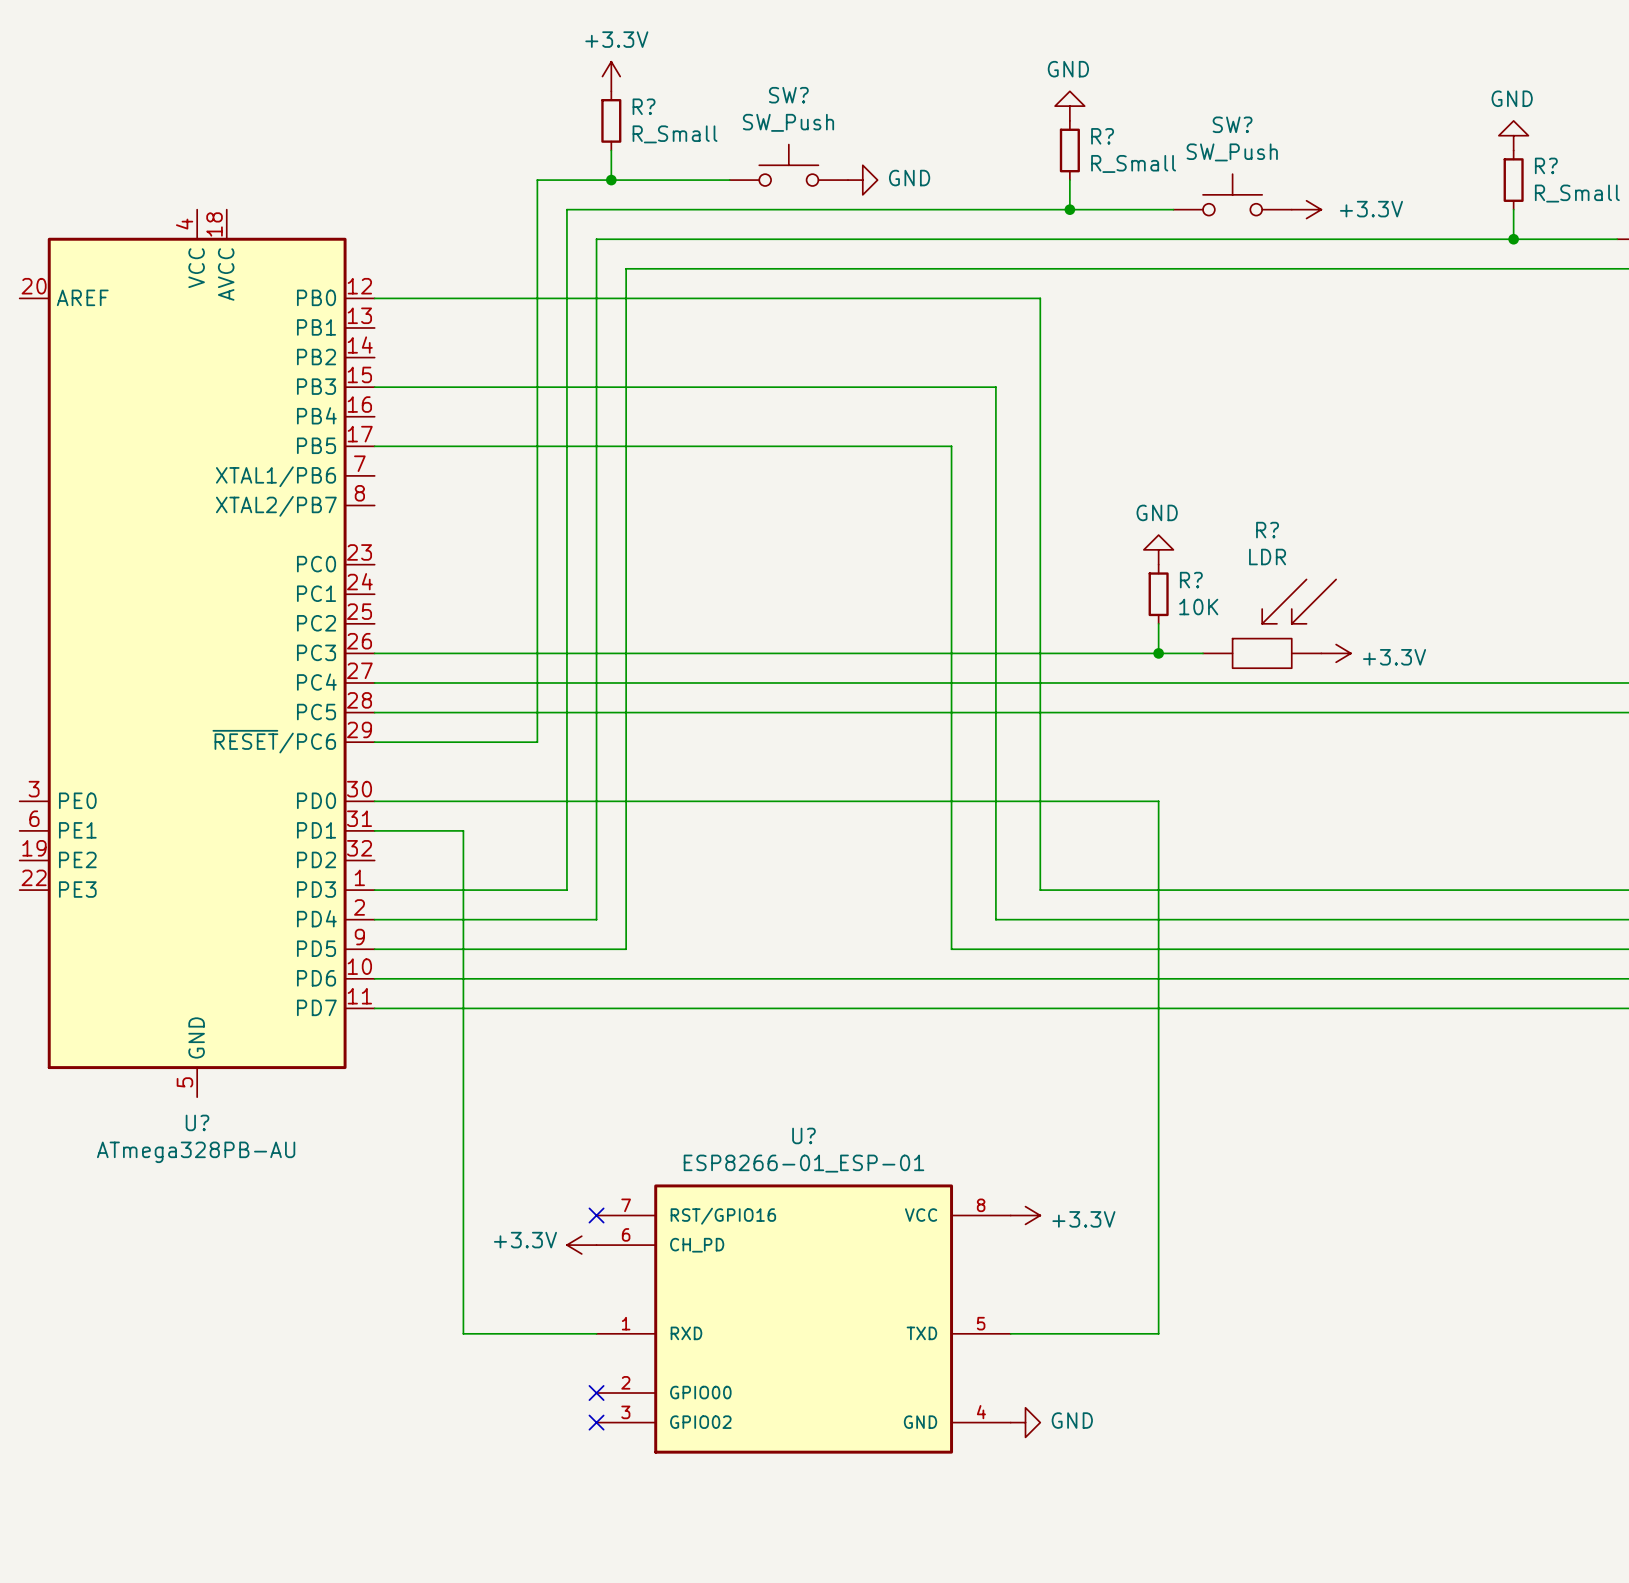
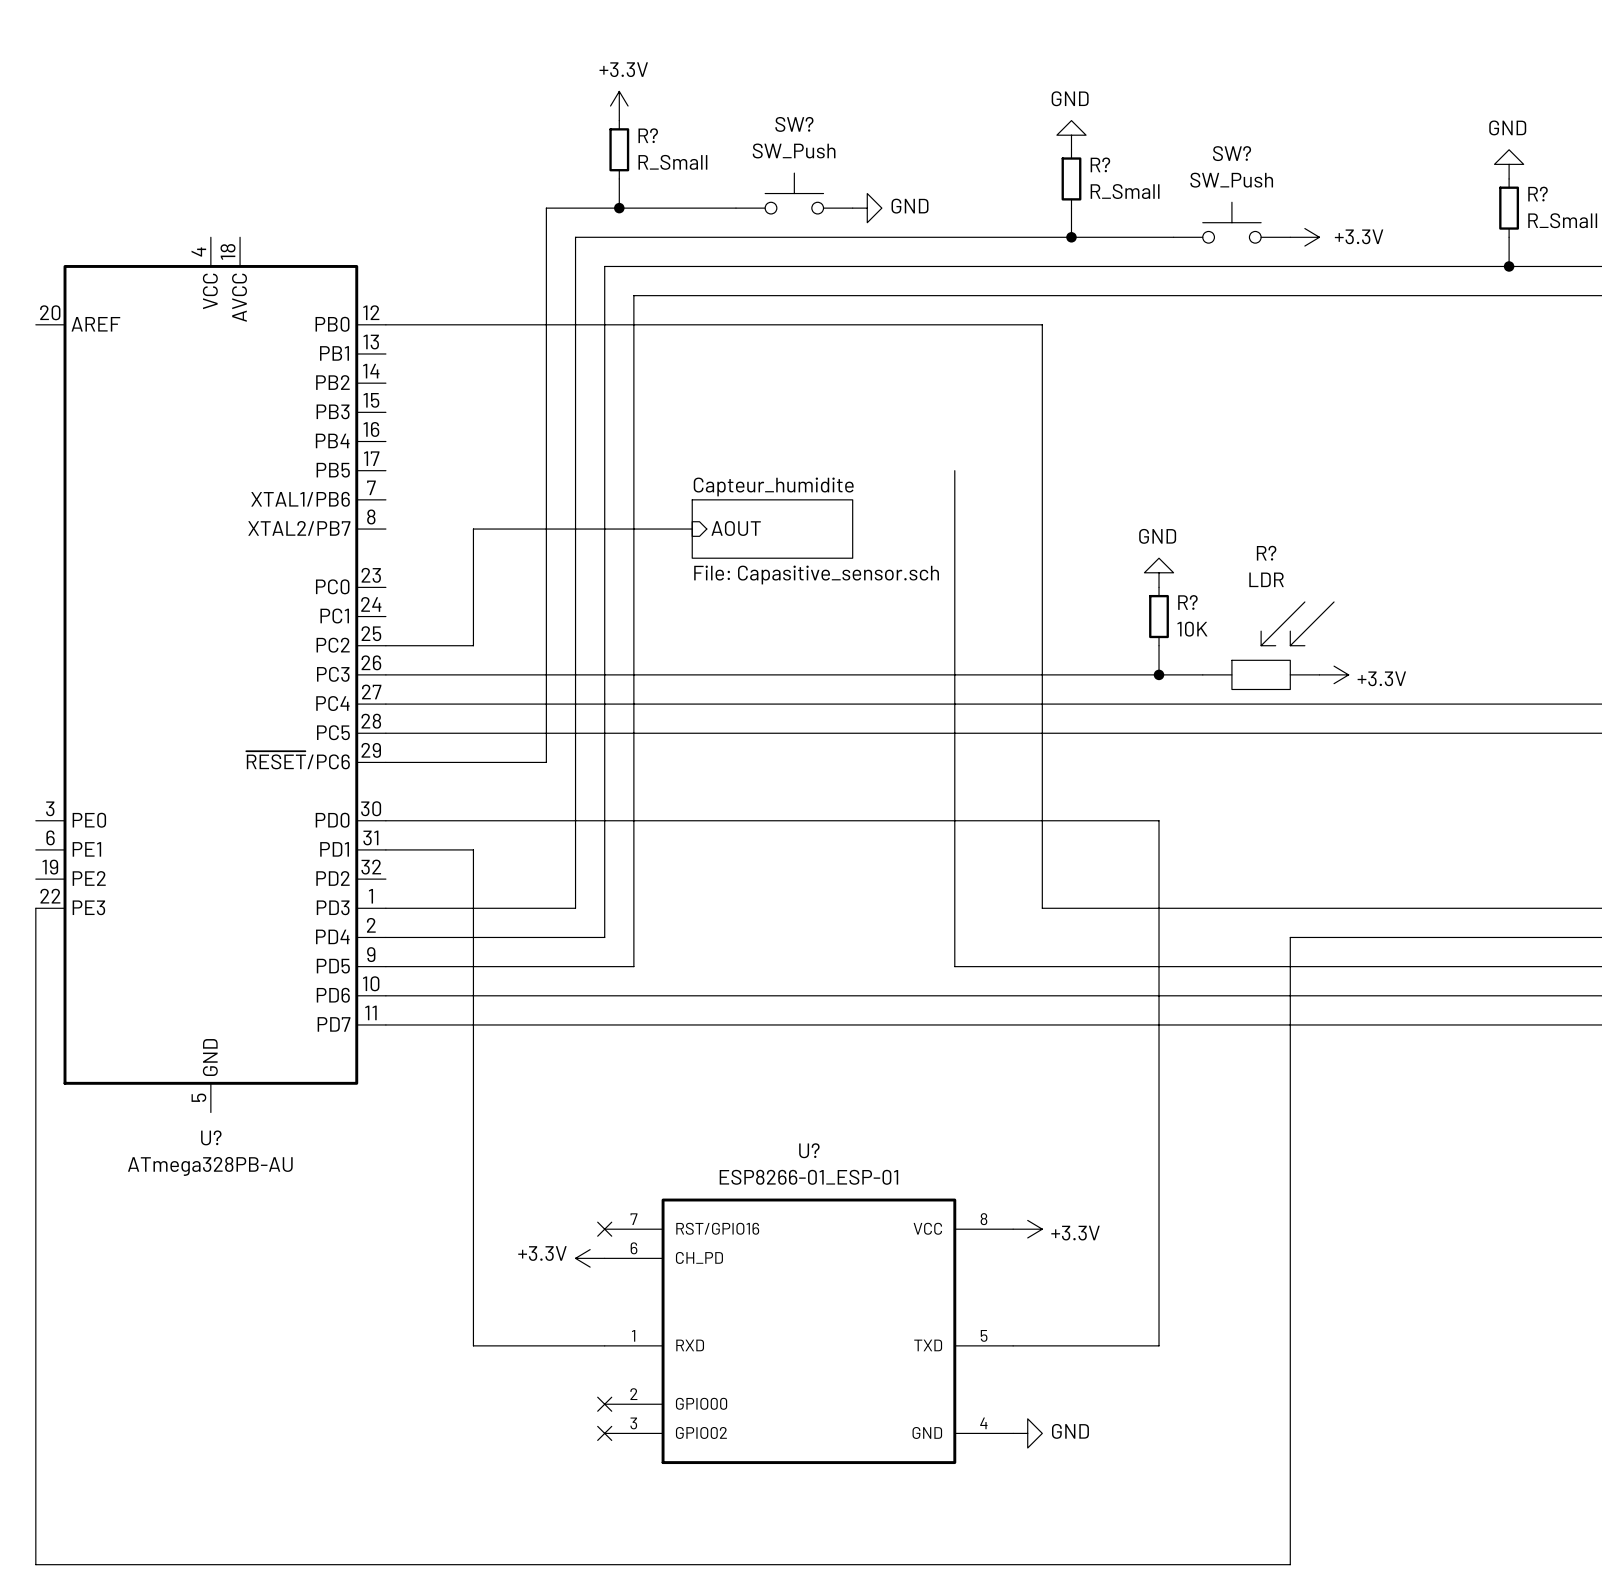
wire: (374, 387) (995, 387) (995, 919) (1291, 919) -> (35, 908) (35, 1564) (1290, 1564) (1290, 937)
wire: (374, 446) (951, 446) -> none
sheet pin: none -> AOUT (736, 528)
wire: none -> (692, 529) (473, 529) (473, 645) (385, 645)
sheet Capteur_humidite: none -> File: Capasitive_sensor.sch (772, 529)

